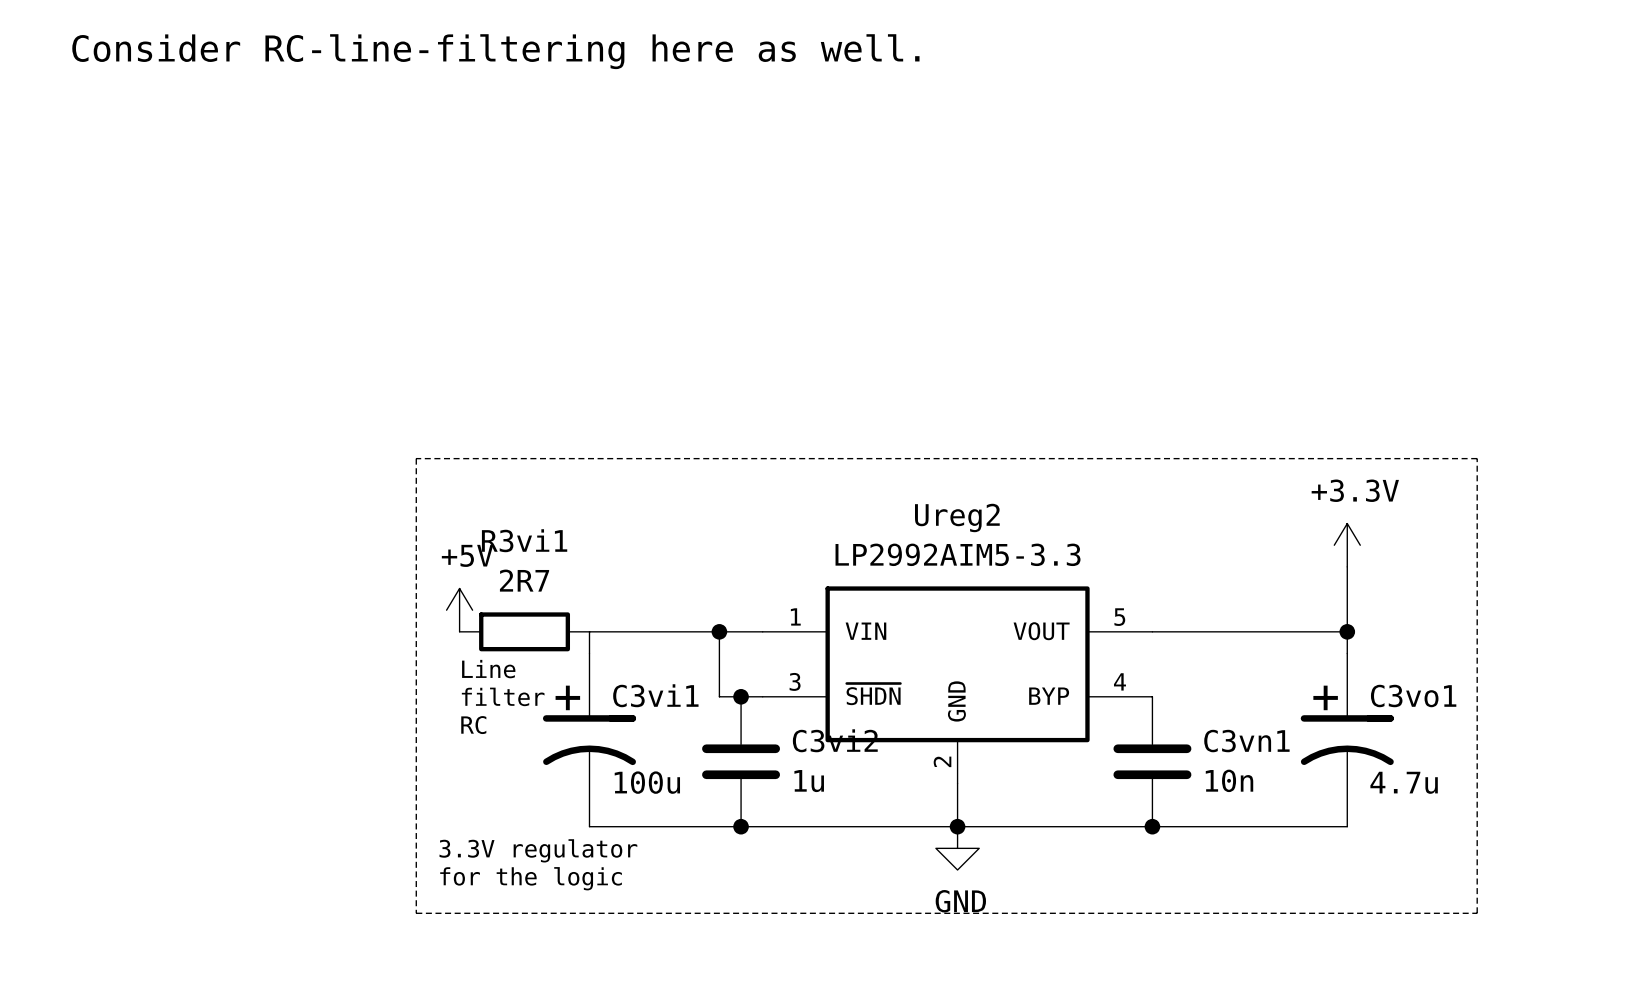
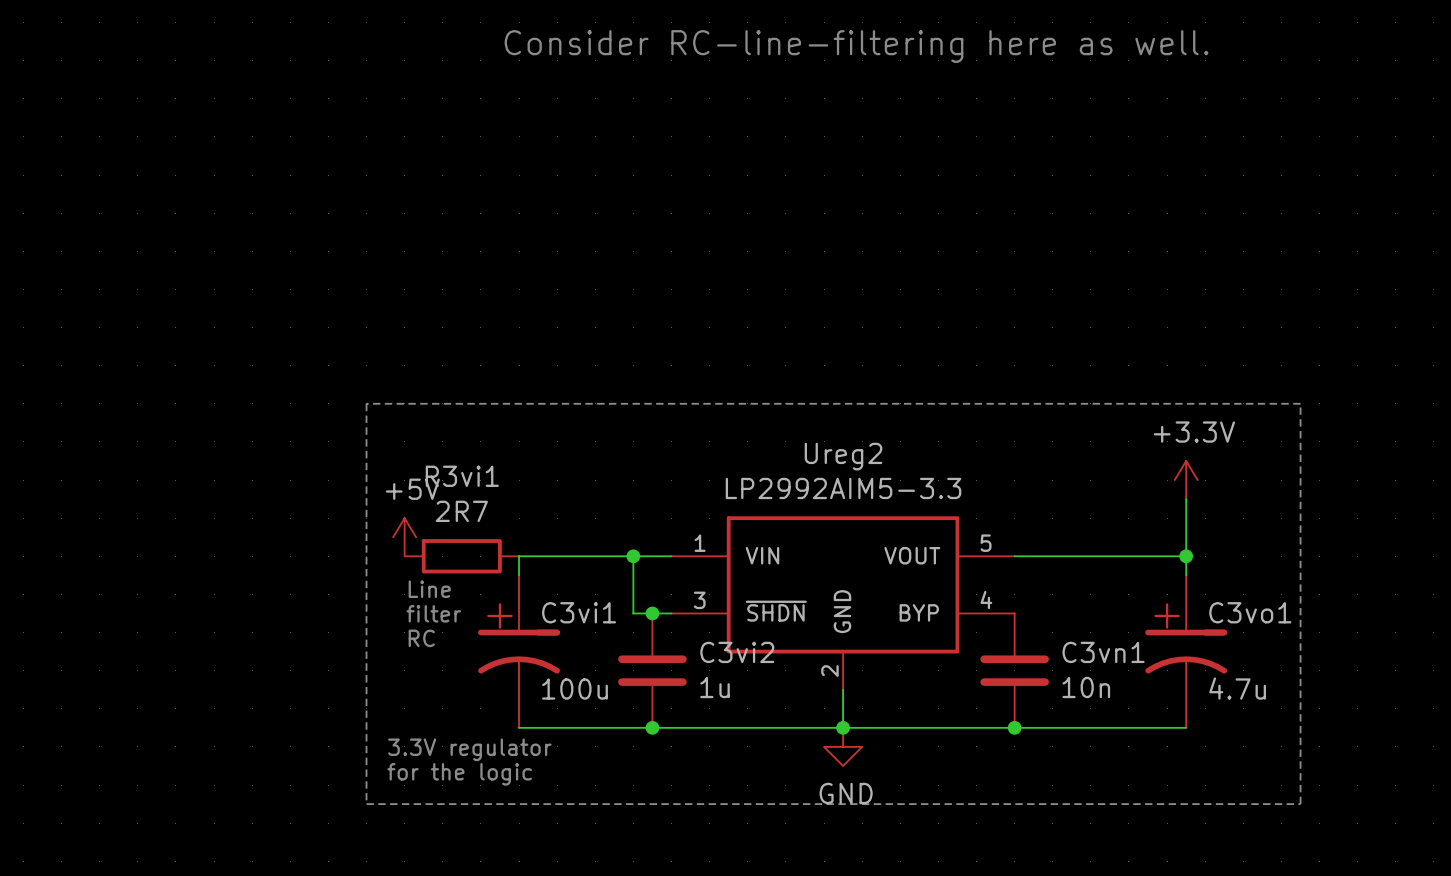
text: Consider RC-line-filtering here as well. (495, 51) -> none
text: none -> Consider RC-line-filtering here as well. (856, 46)

